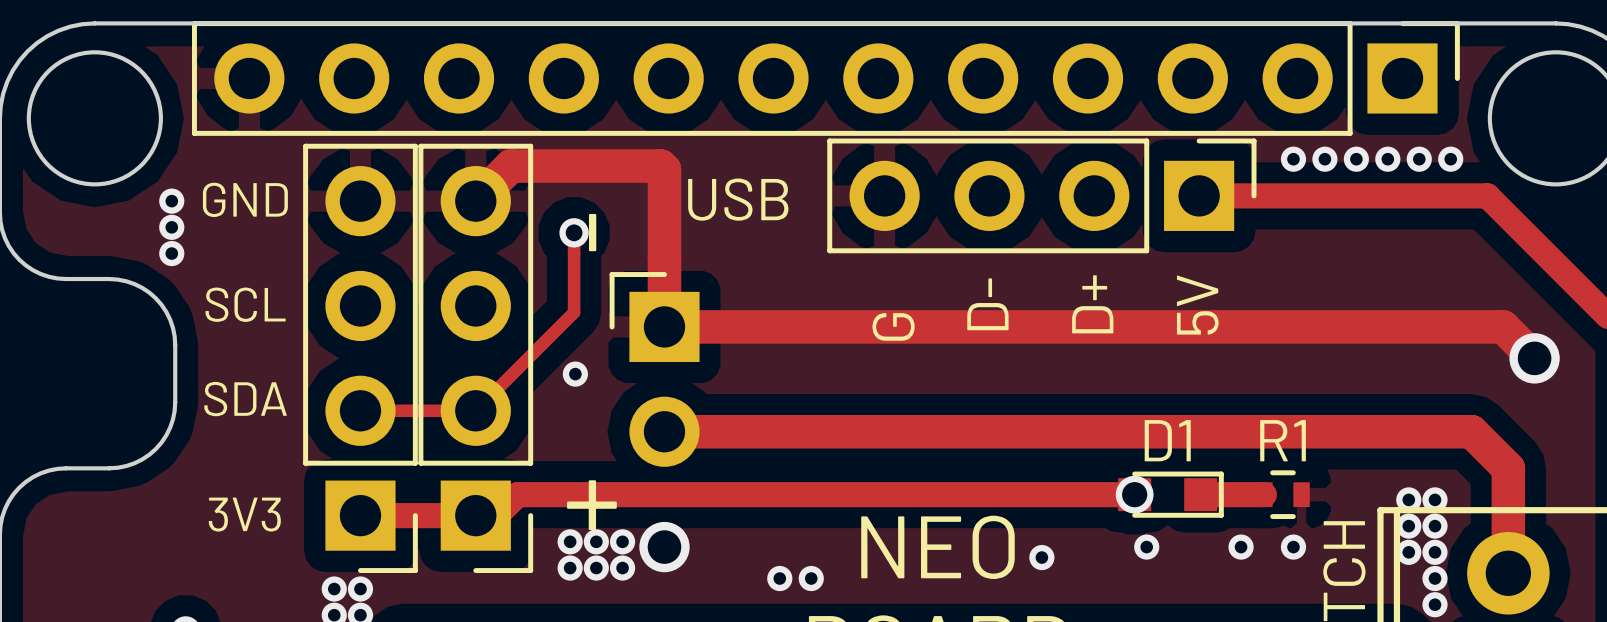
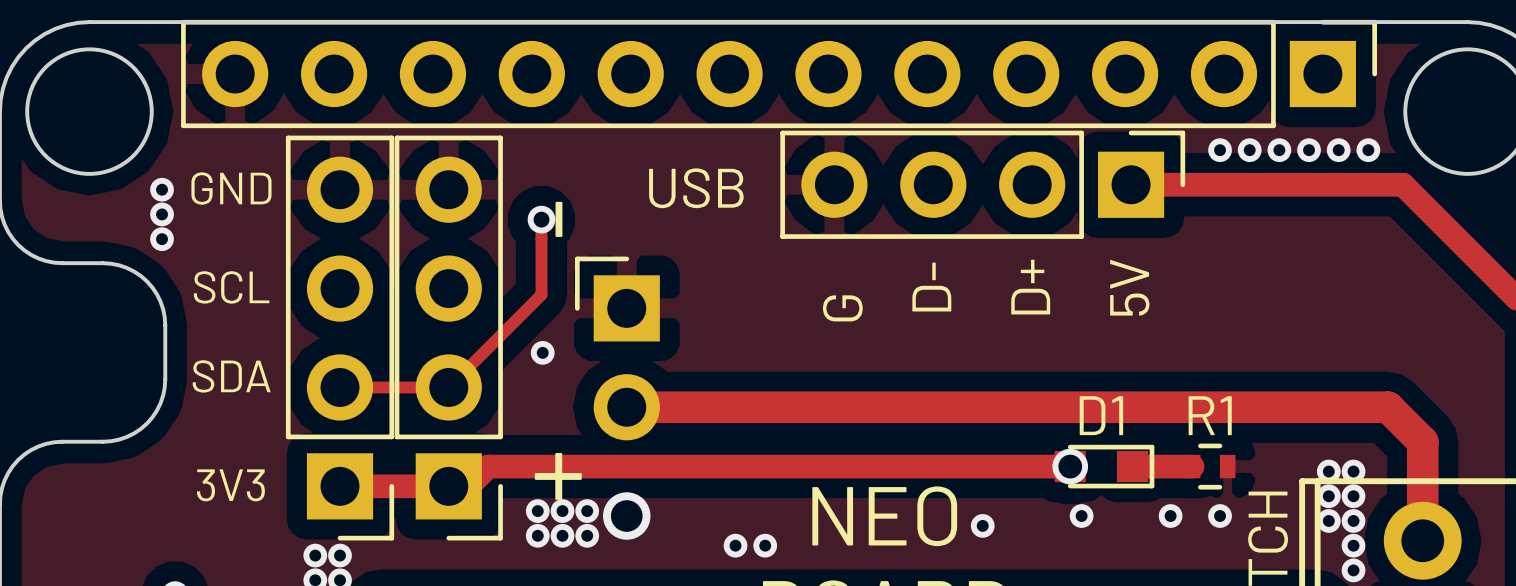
track: (475, 201) (510, 166) (660, 166) (664, 169) (664, 326) (1503, 326) (1534, 358) -> none
via: (1534, 358) -> none

